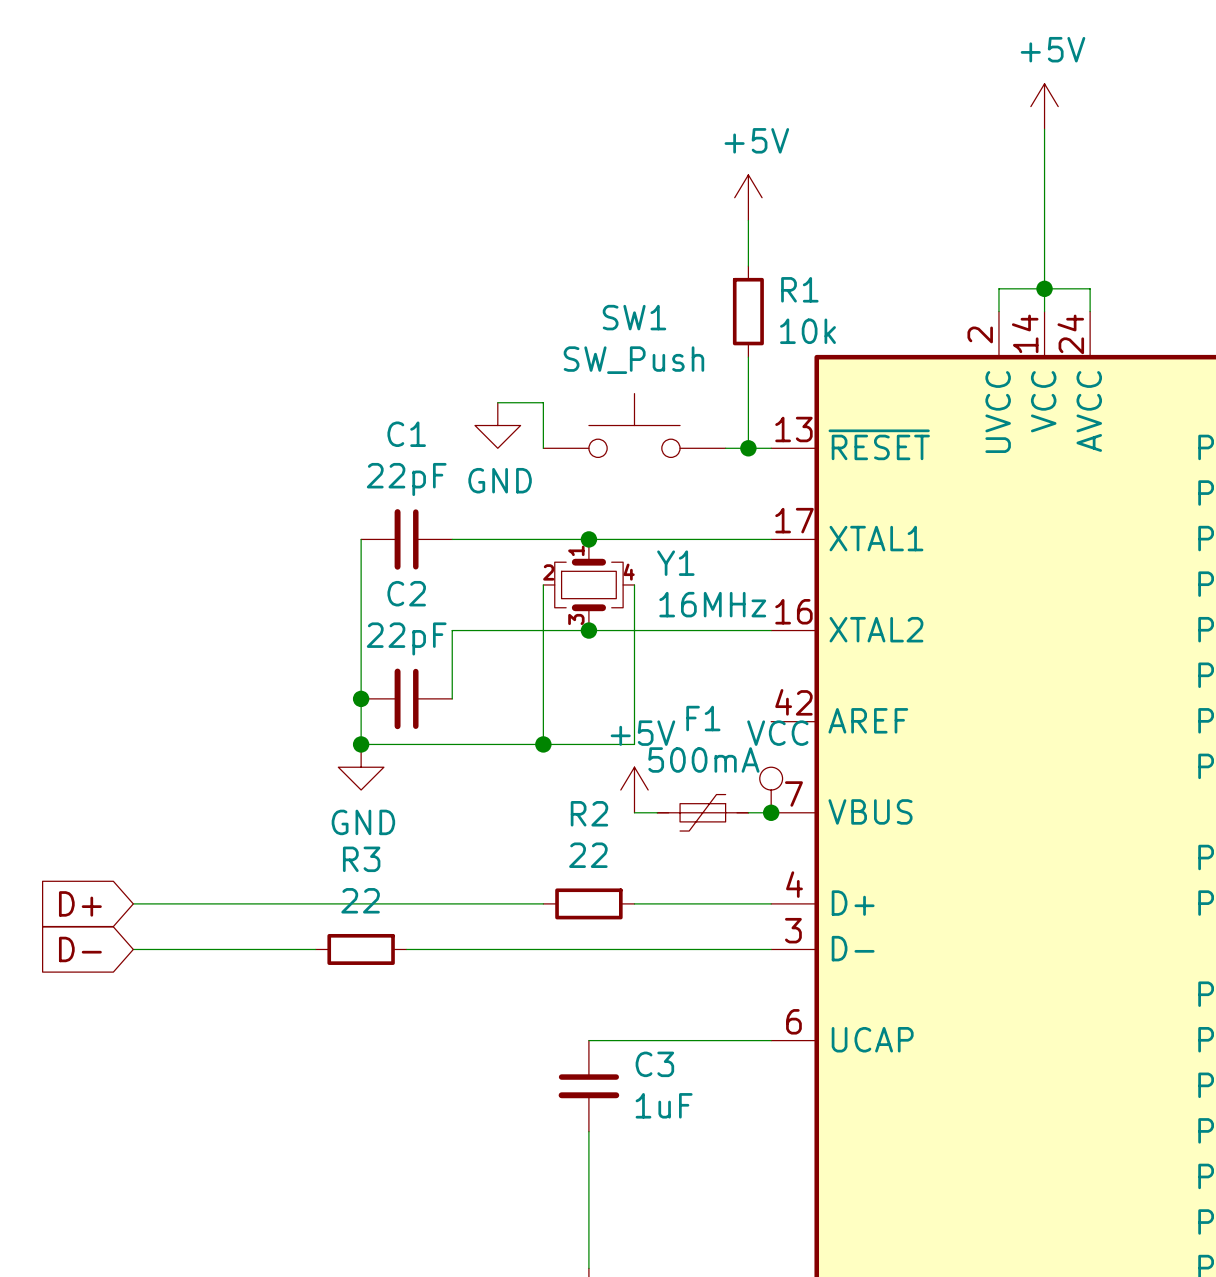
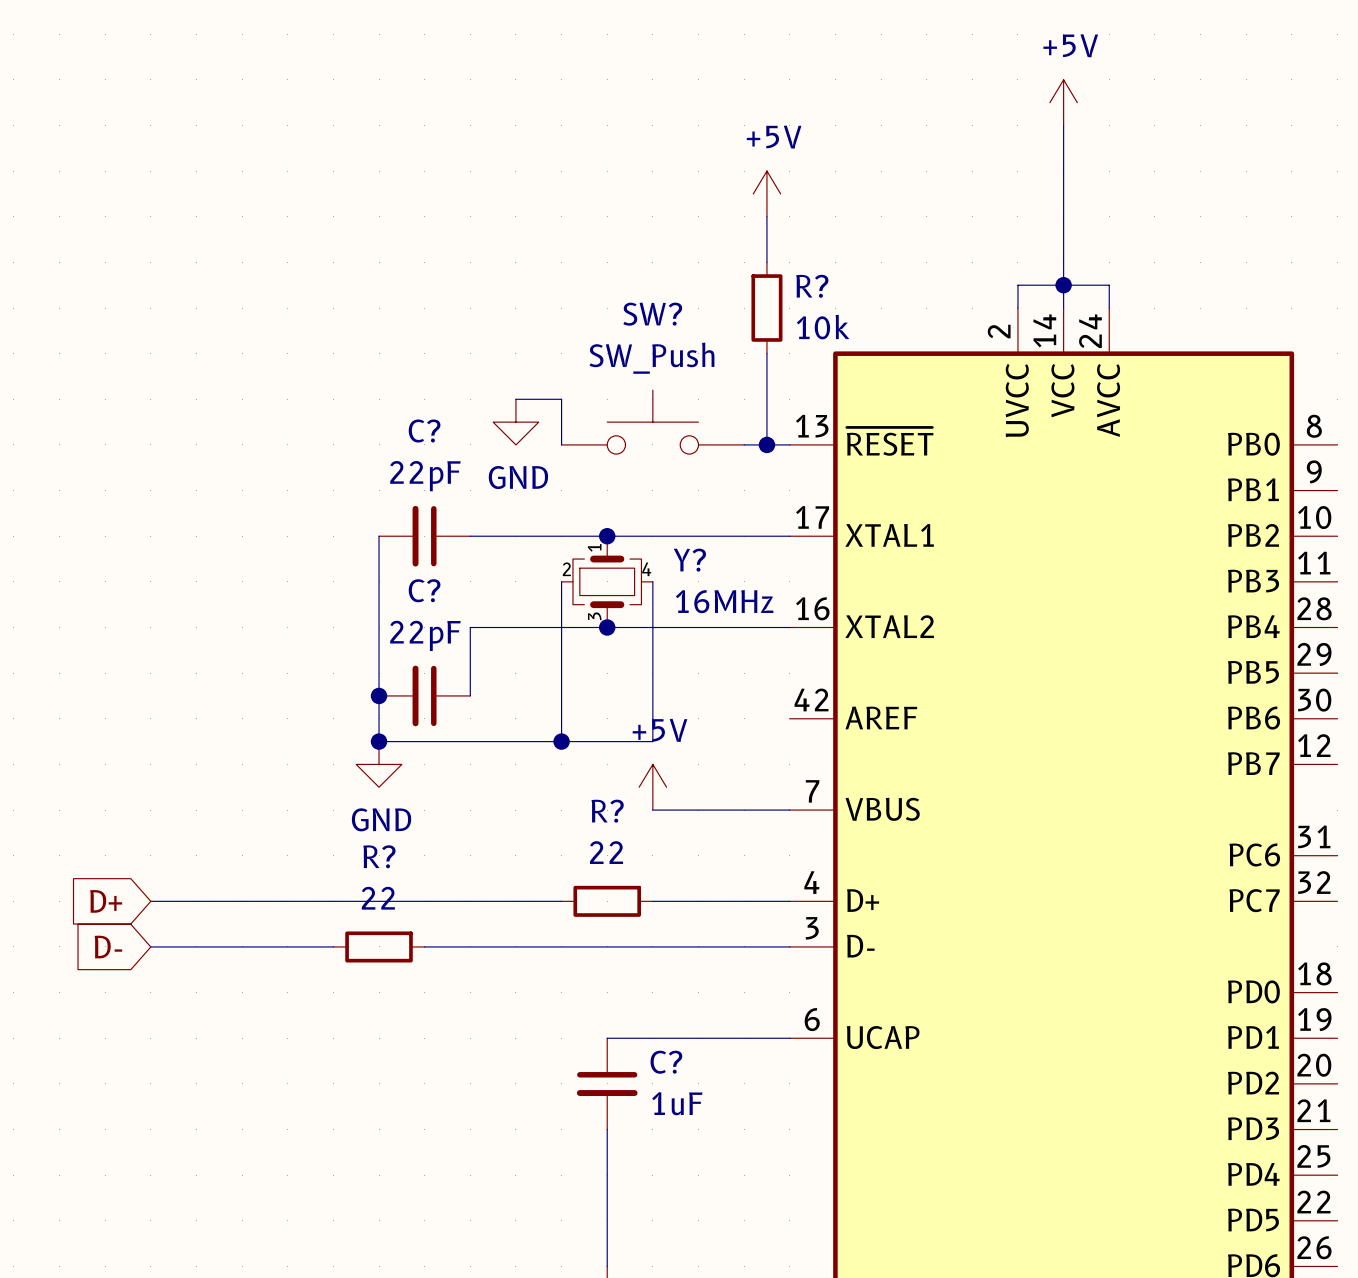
R1 name: R1 (799, 289) -> R? (812, 286)
SW1 name: SW1 (634, 317) -> SW? (652, 314)
C1 name: C1 (406, 434) -> C? (424, 431)
Y1 name: Y1 (675, 563) -> Y? (689, 560)
C2 name: C2 (406, 593) -> C? (424, 590)
power symbol: VCC (771, 790) -> none
F1: 500mA (702, 812) -> none
junction: (771, 812) -> none
R2 name: R2 (589, 813) -> R? (607, 811)
R3 name: R3 (361, 859) -> R? (379, 856)
C3 name: C3 (654, 1064) -> C? (666, 1062)

